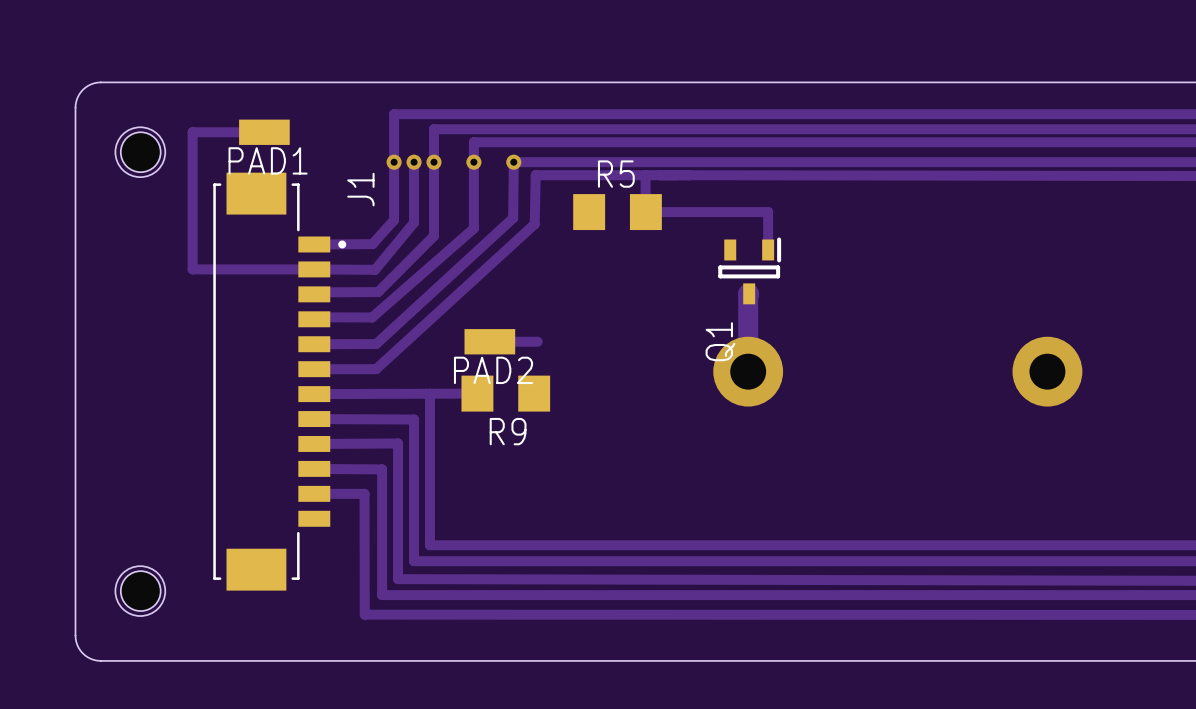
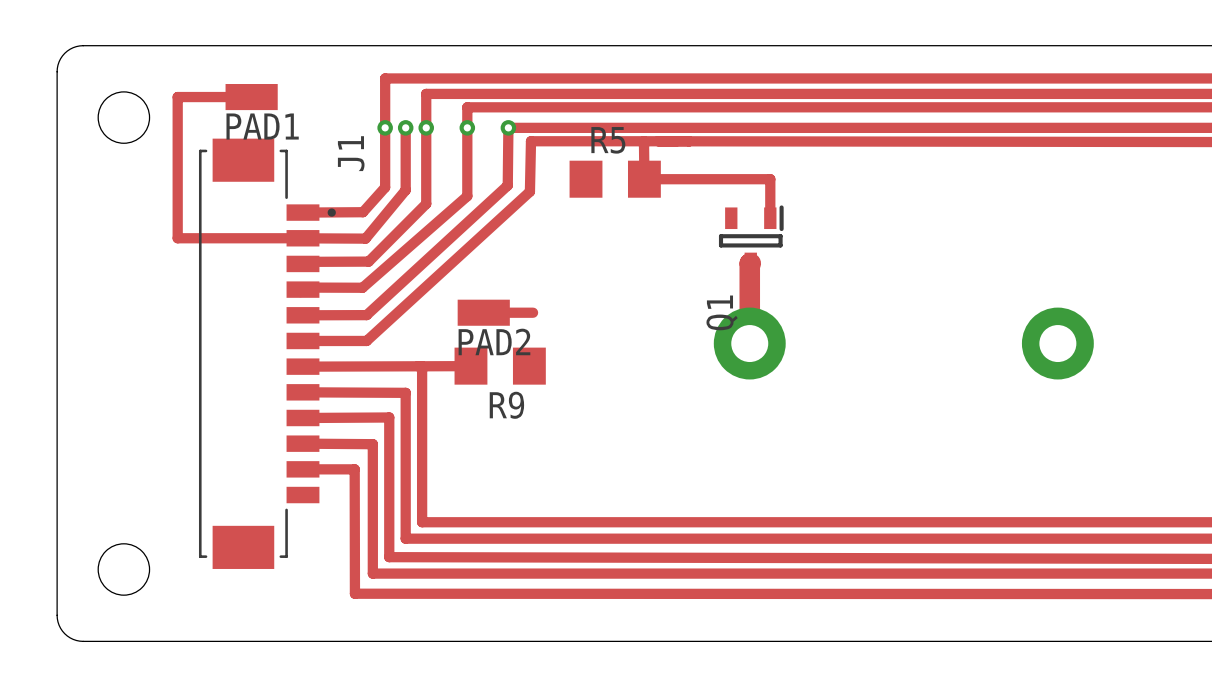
hole: (140, 152) -> none
hole: (140, 591) -> none

